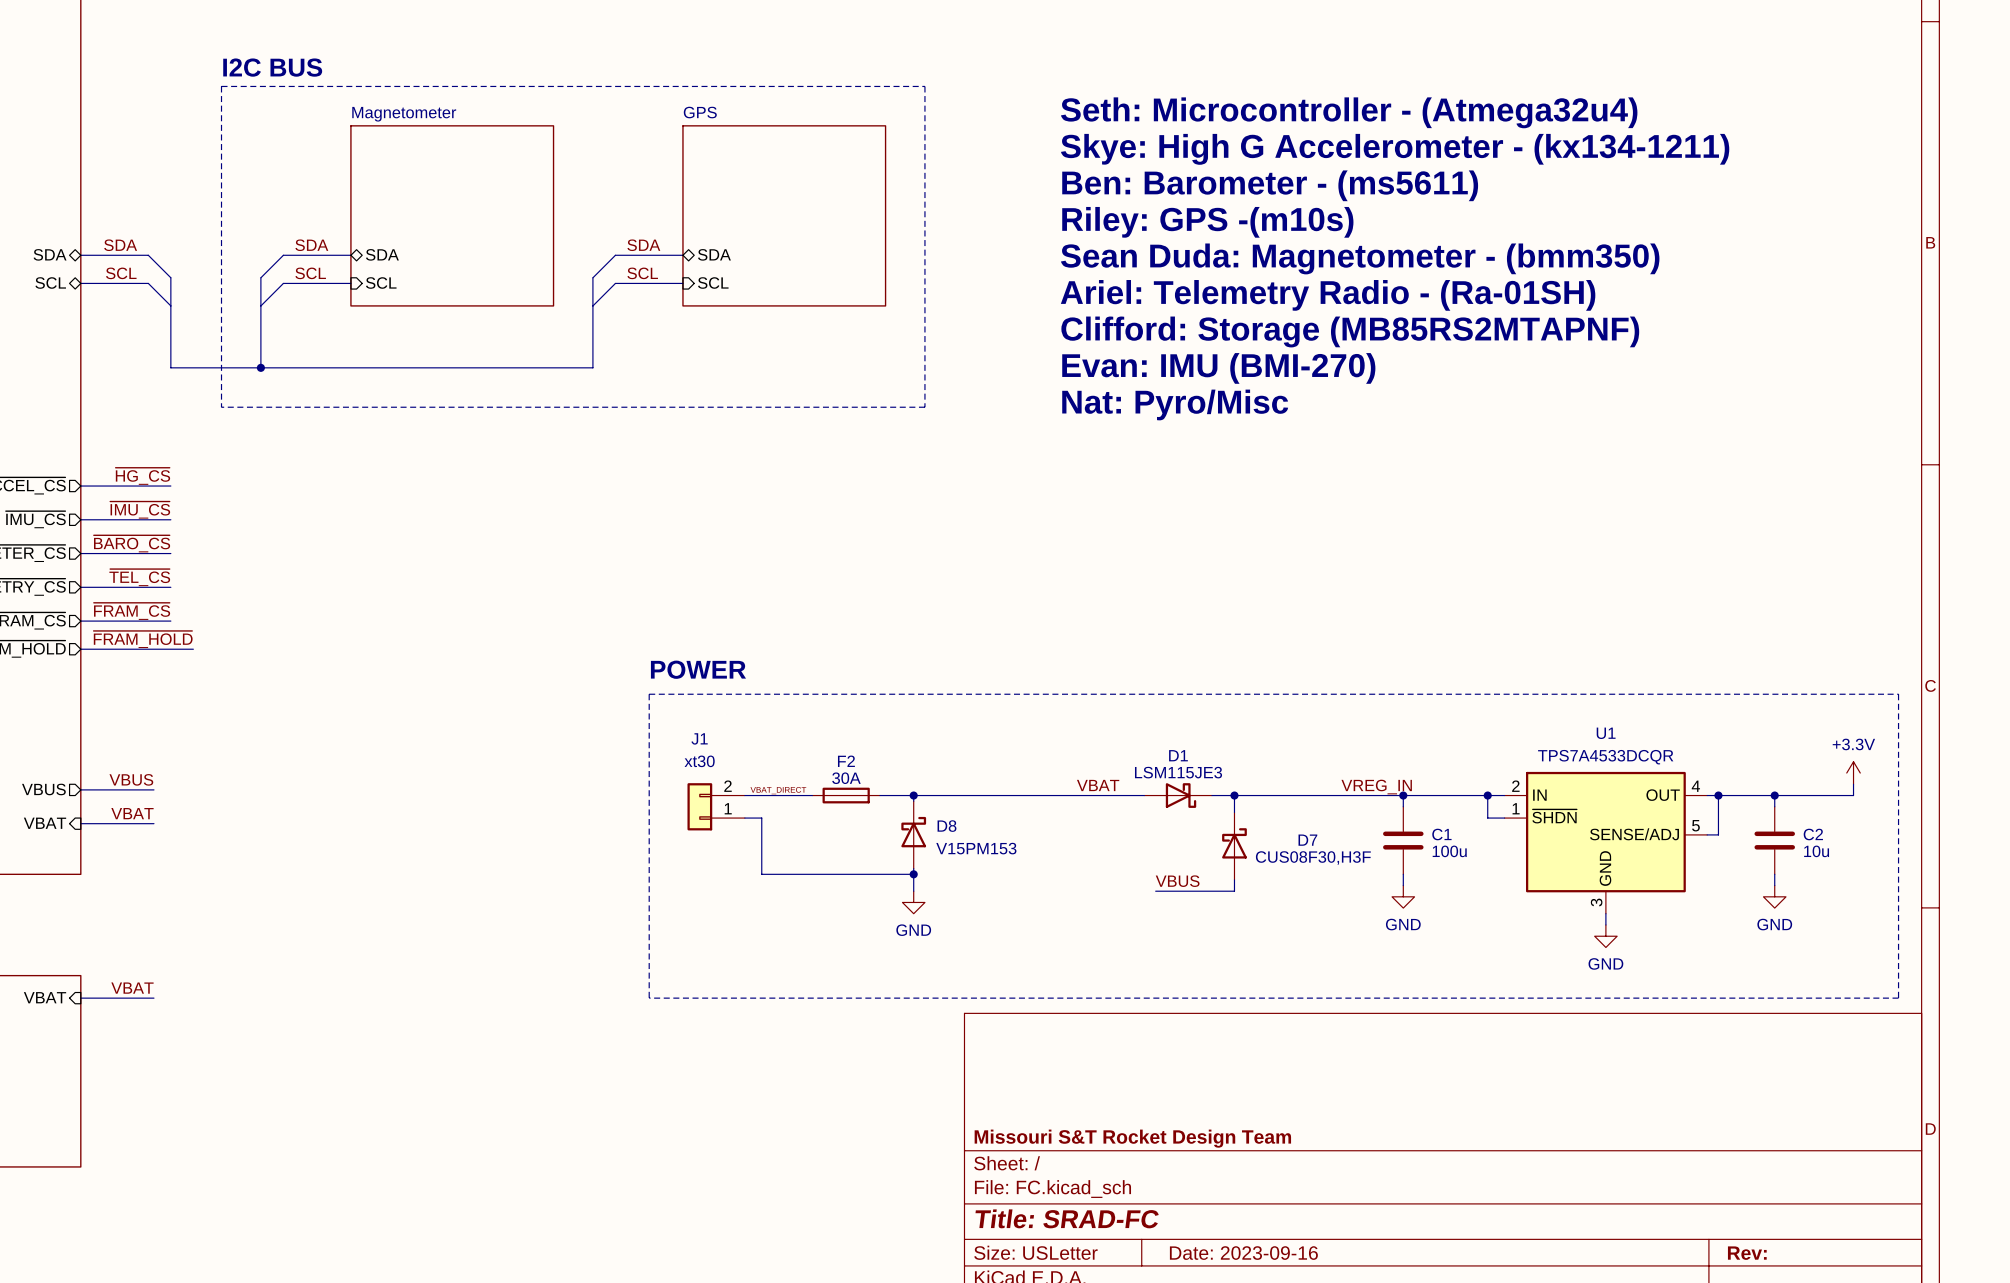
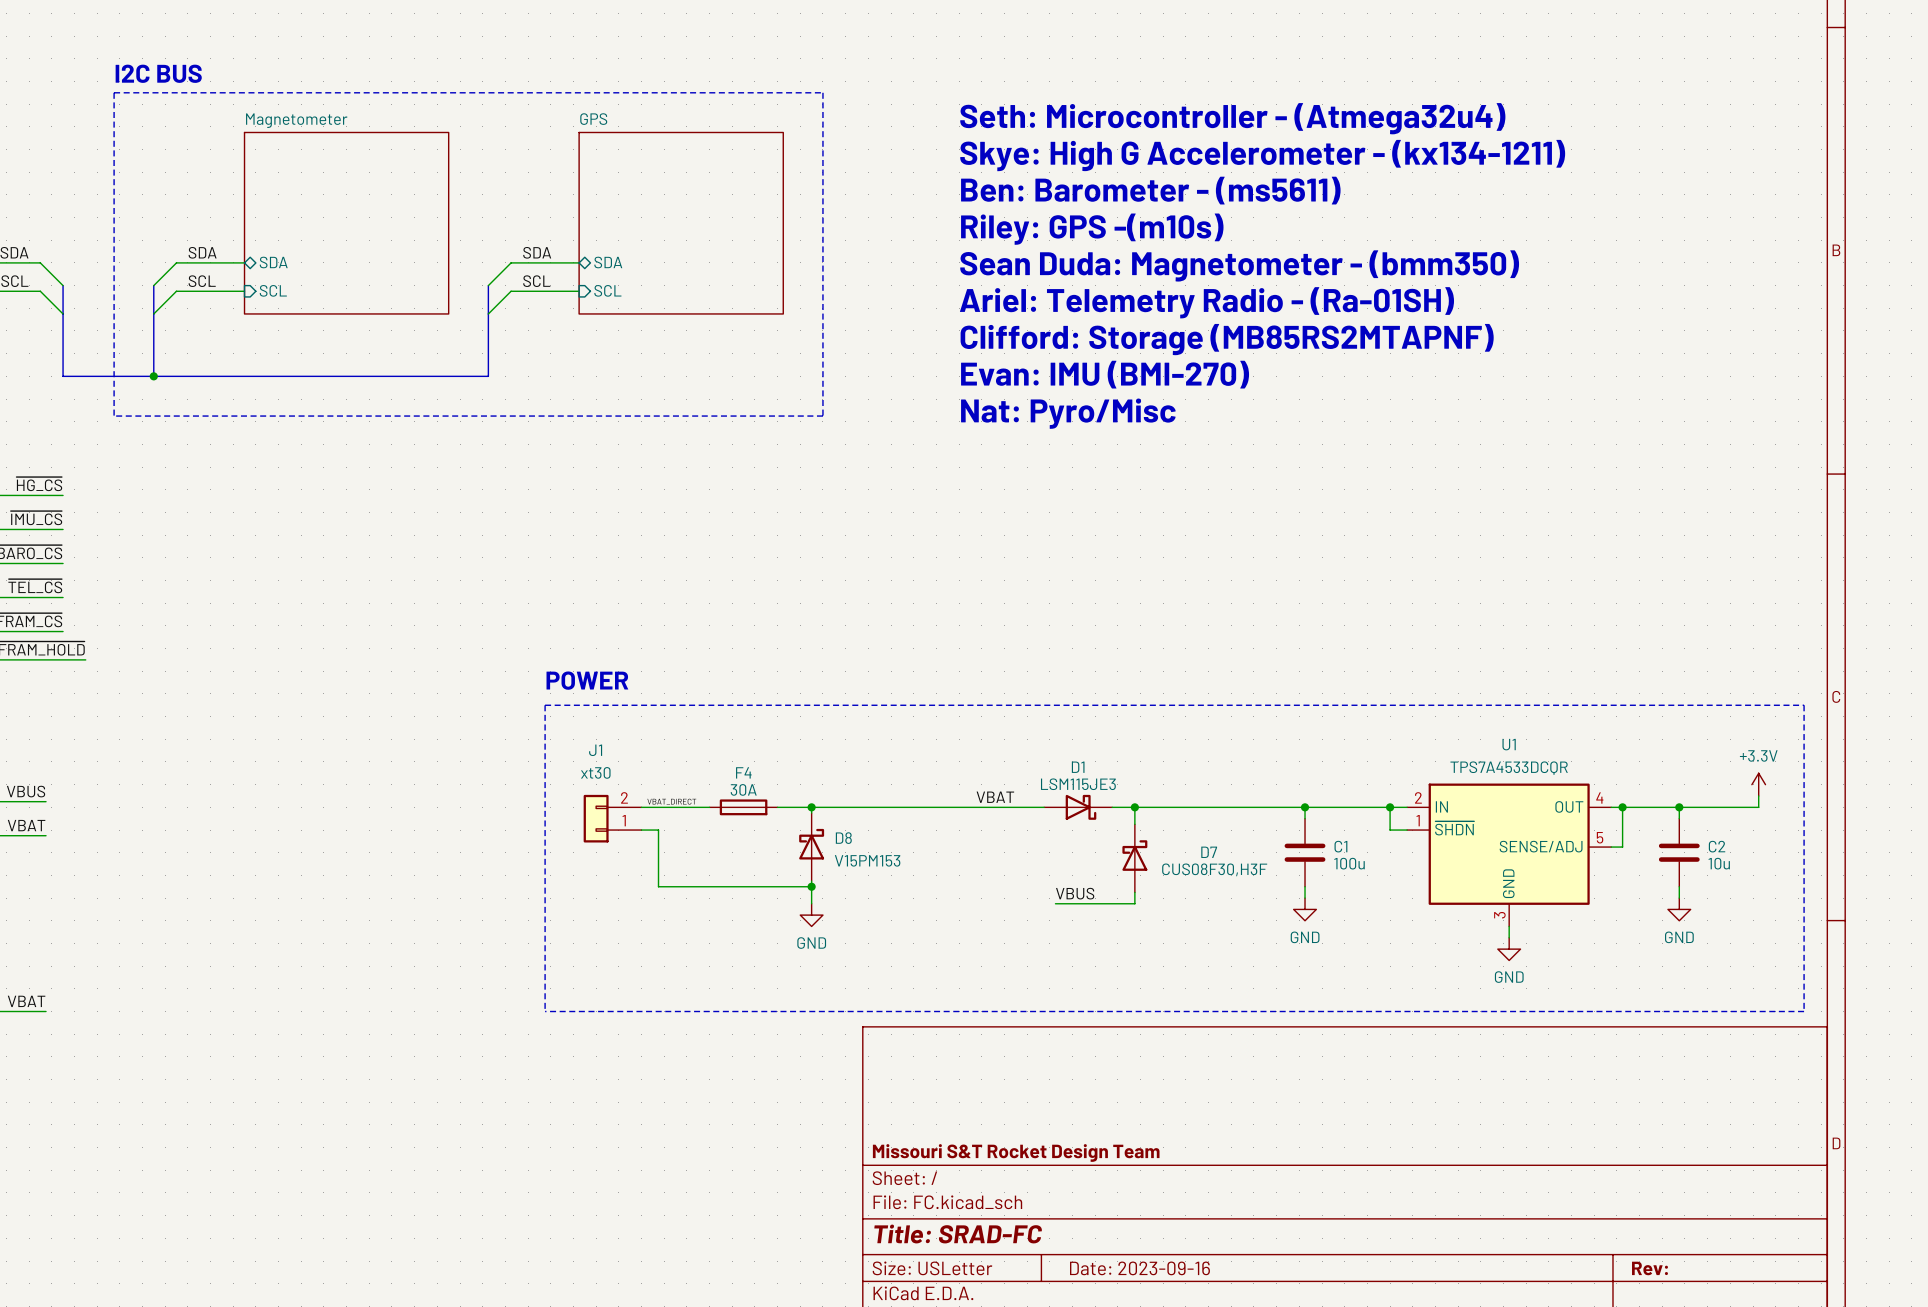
F2 name: F2 (846, 761) -> F4 (743, 772)
label: VREG_IN (1376, 787) -> none

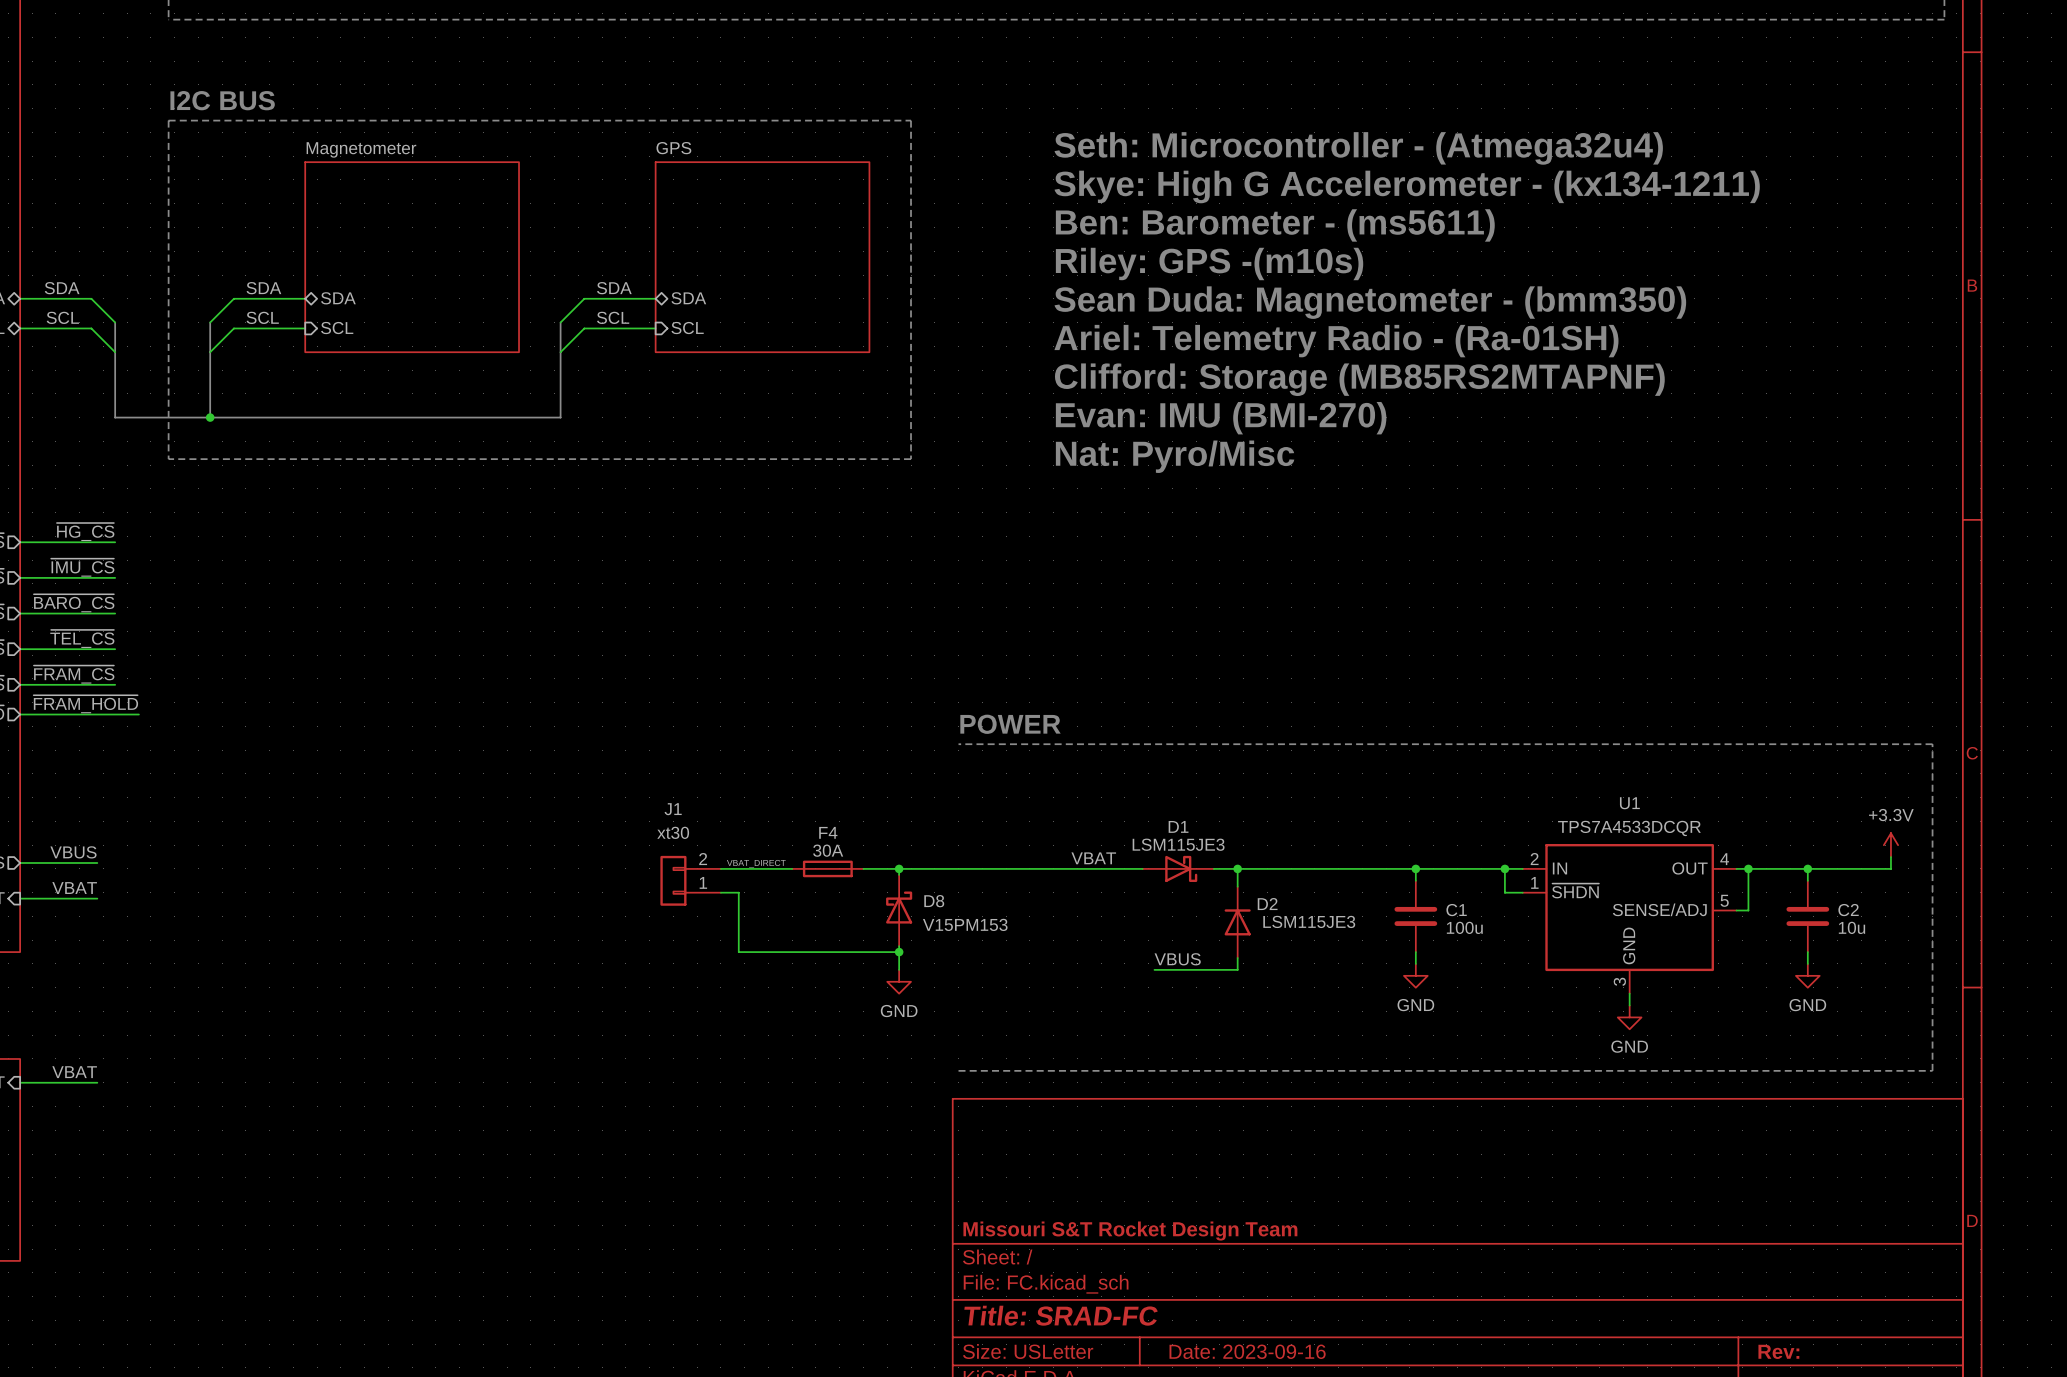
text: none -> POWER (1010, 724)
text: POWER (587, 680) -> none
line: none -> (958, 744) (1932, 744) (1932, 1070) (958, 1070)
line: (545, 705) (1804, 705) (1804, 1011) (545, 1011) (545, 705) -> none
D7: CUS08F30,H3F (1134, 858) -> none
D2: none -> LSM115JE3 (1237, 922)

